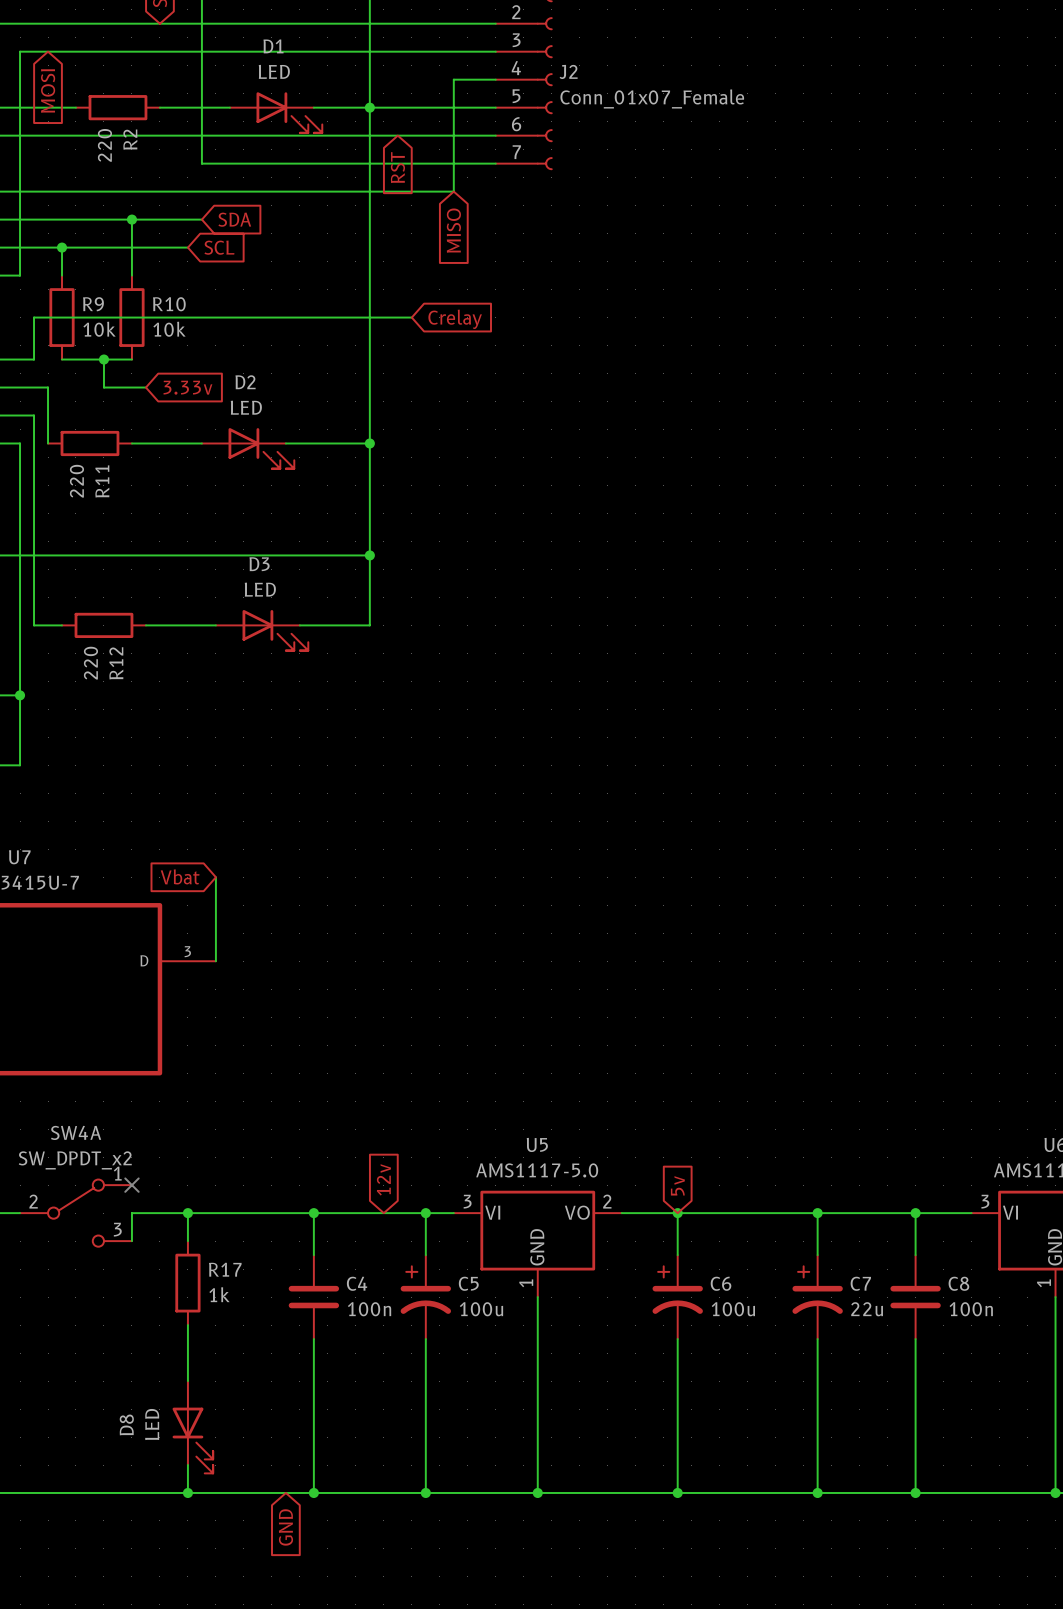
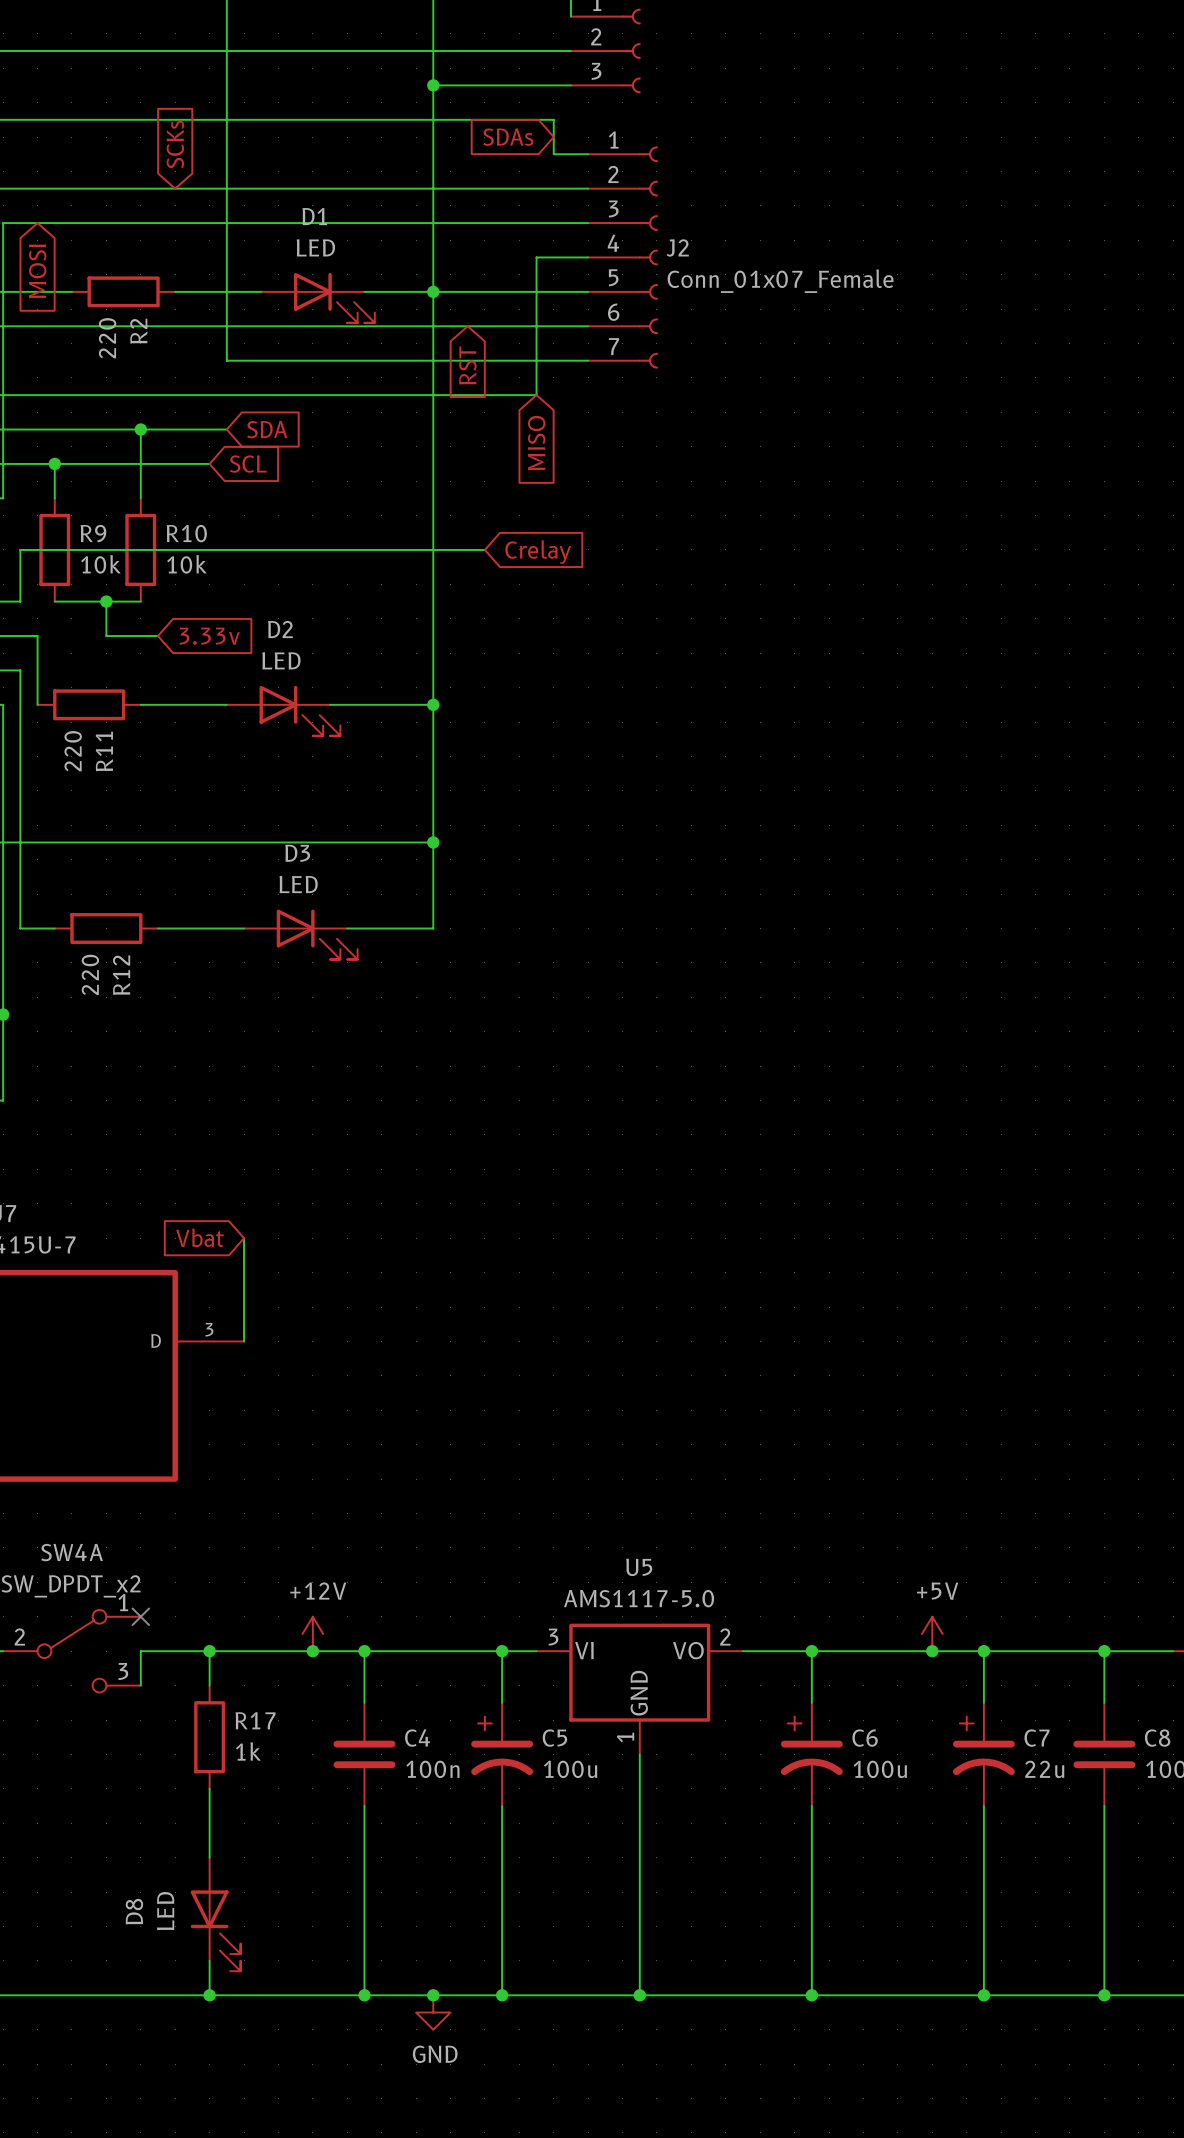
global label: 12v (383, 1179) -> none
global label: 5v (677, 1185) -> none
power symbol: none -> +12V (312, 1633)
power symbol: none -> +5V (932, 1633)
junction: none -> (312, 1651)
junction: none -> (932, 1651)
junction: none -> (433, 1995)
power symbol: none -> GND (433, 2012)
global label: GND (285, 1527) -> none

